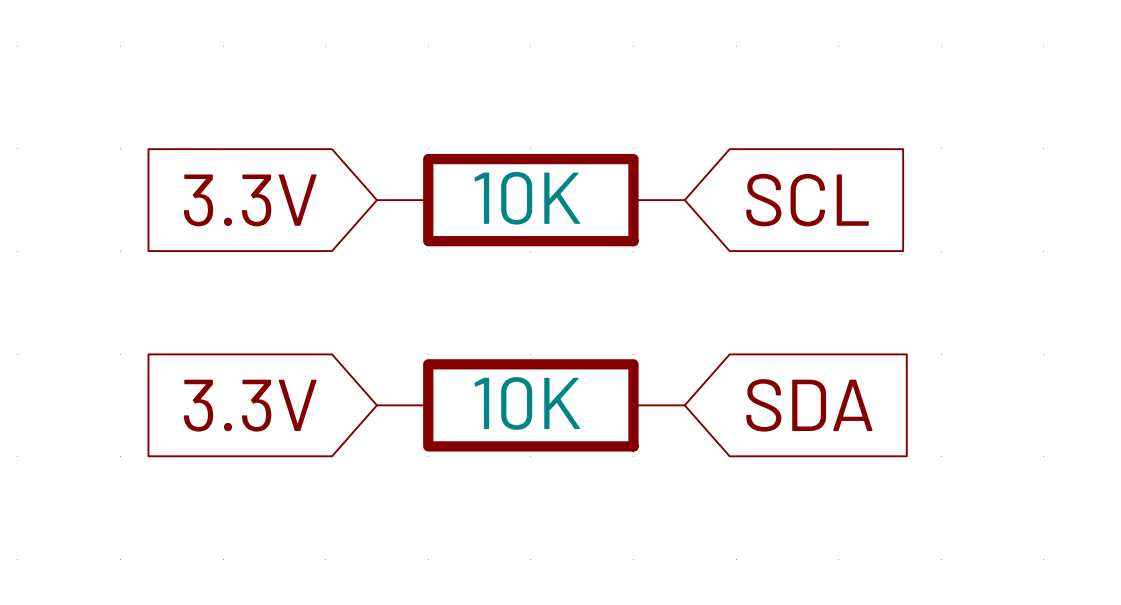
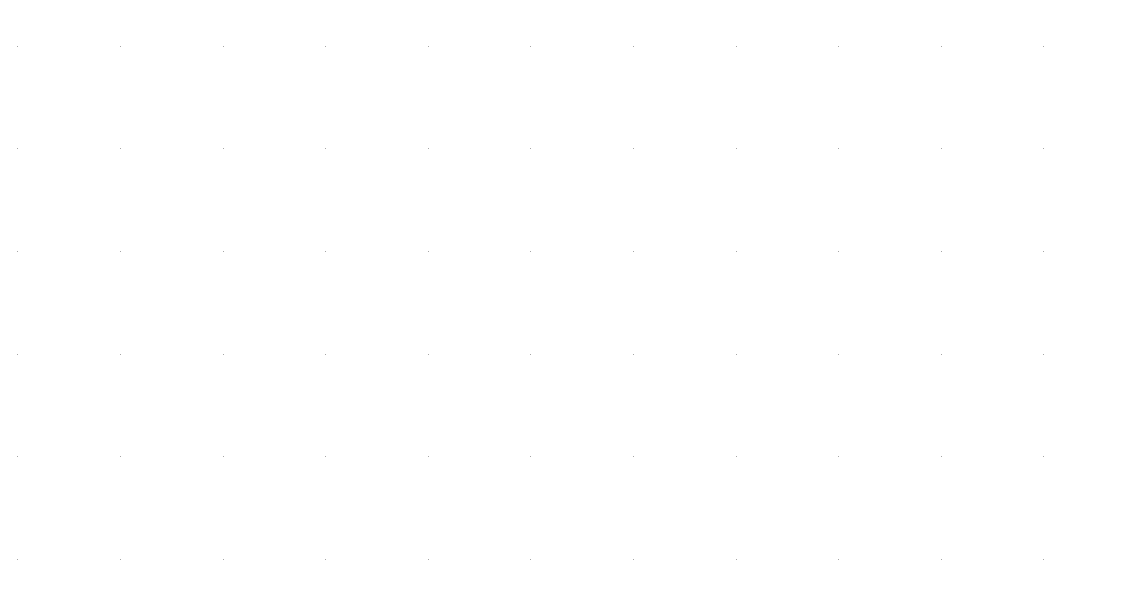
global label: 3.3V (250, 200) -> none
part: 10K (530, 200) -> none
global label: SCL (807, 200) -> none
global label: 3.3V (250, 405) -> none
part: 10K (530, 405) -> none
global label: SDA (809, 405) -> none

